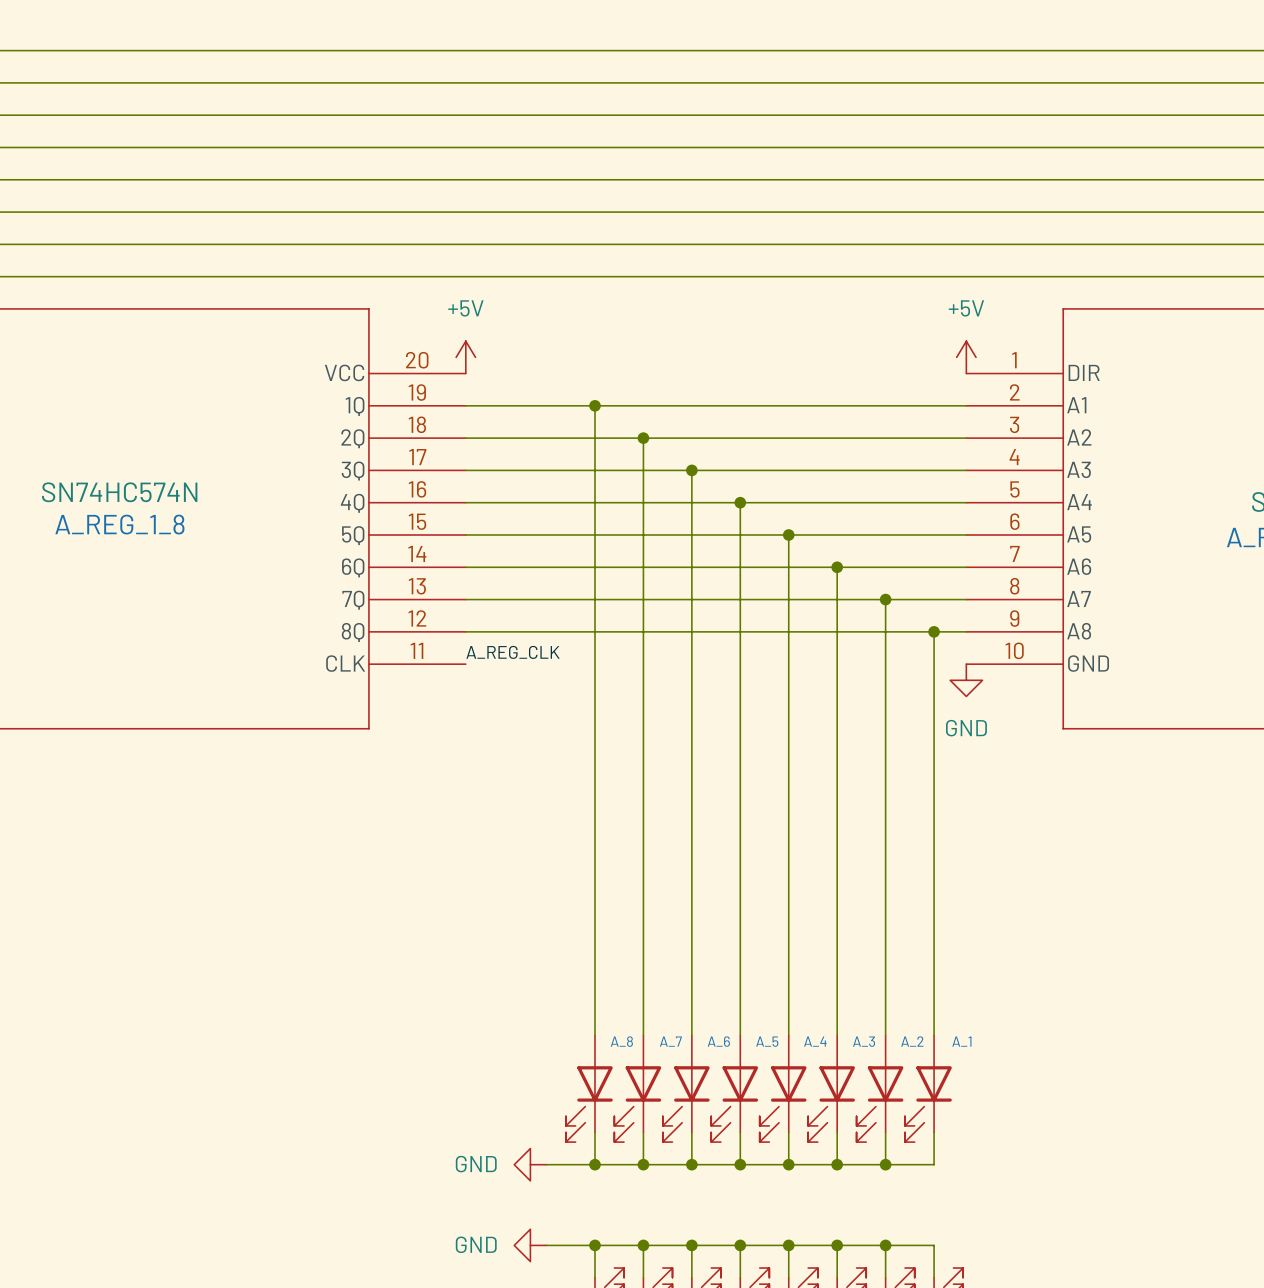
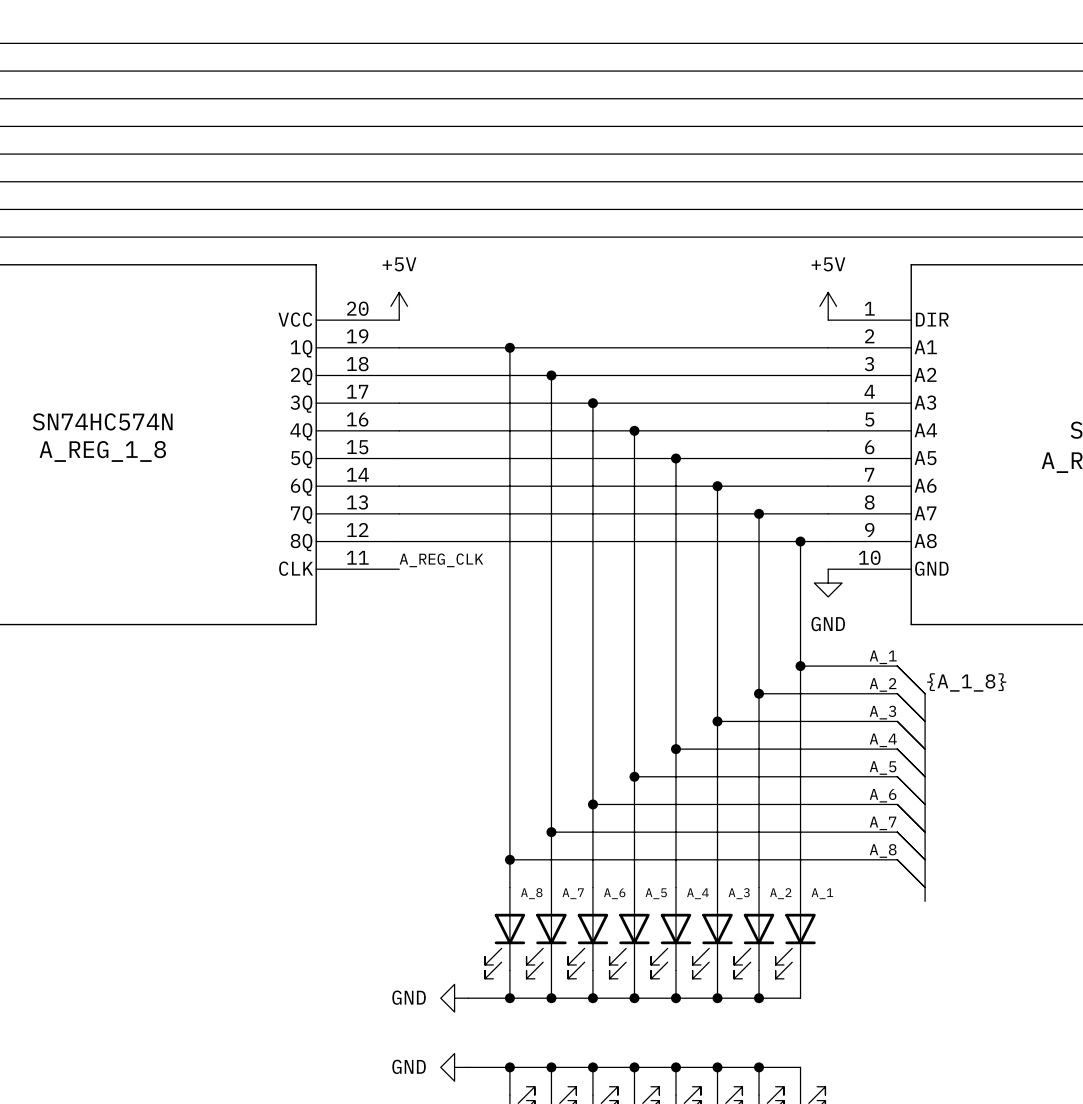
label: none -> A_1 (883, 657)
wire: none -> (800, 666) (897, 666) (925, 693)
junction: none -> (800, 666)
label: none -> {A_1_8} (966, 682)
label: none -> A_2 (883, 684)
wire: none -> (759, 693) (897, 693) (925, 721)
junction: none -> (759, 693)
bus: none -> (925, 693) (925, 901)
label: none -> A_3 (882, 712)
wire: none -> (717, 721) (897, 721) (925, 749)
junction: none -> (717, 721)
label: none -> A_4 (883, 740)
wire: none -> (675, 749) (897, 749) (925, 776)
junction: none -> (675, 749)
label: none -> A_5 (883, 768)
wire: none -> (634, 776) (897, 776) (925, 804)
junction: none -> (634, 776)
label: none -> A_6 (883, 795)
wire: none -> (592, 804) (897, 804) (925, 832)
junction: none -> (592, 804)
label: none -> A_7 (883, 823)
wire: none -> (551, 832) (897, 832) (925, 859)
junction: none -> (551, 832)
label: none -> A_8 (883, 850)
wire: none -> (509, 859) (897, 859) (925, 887)
junction: none -> (509, 859)

